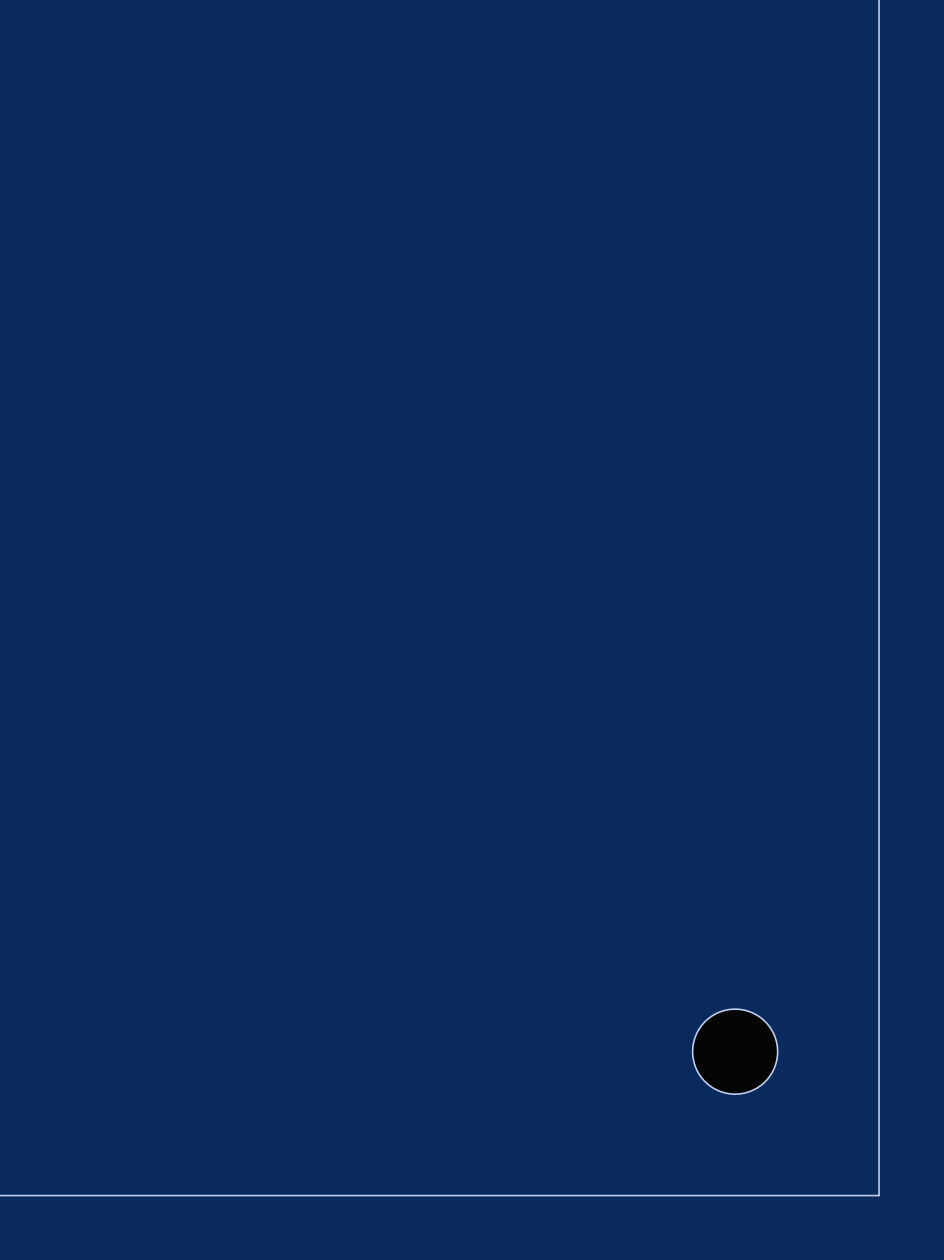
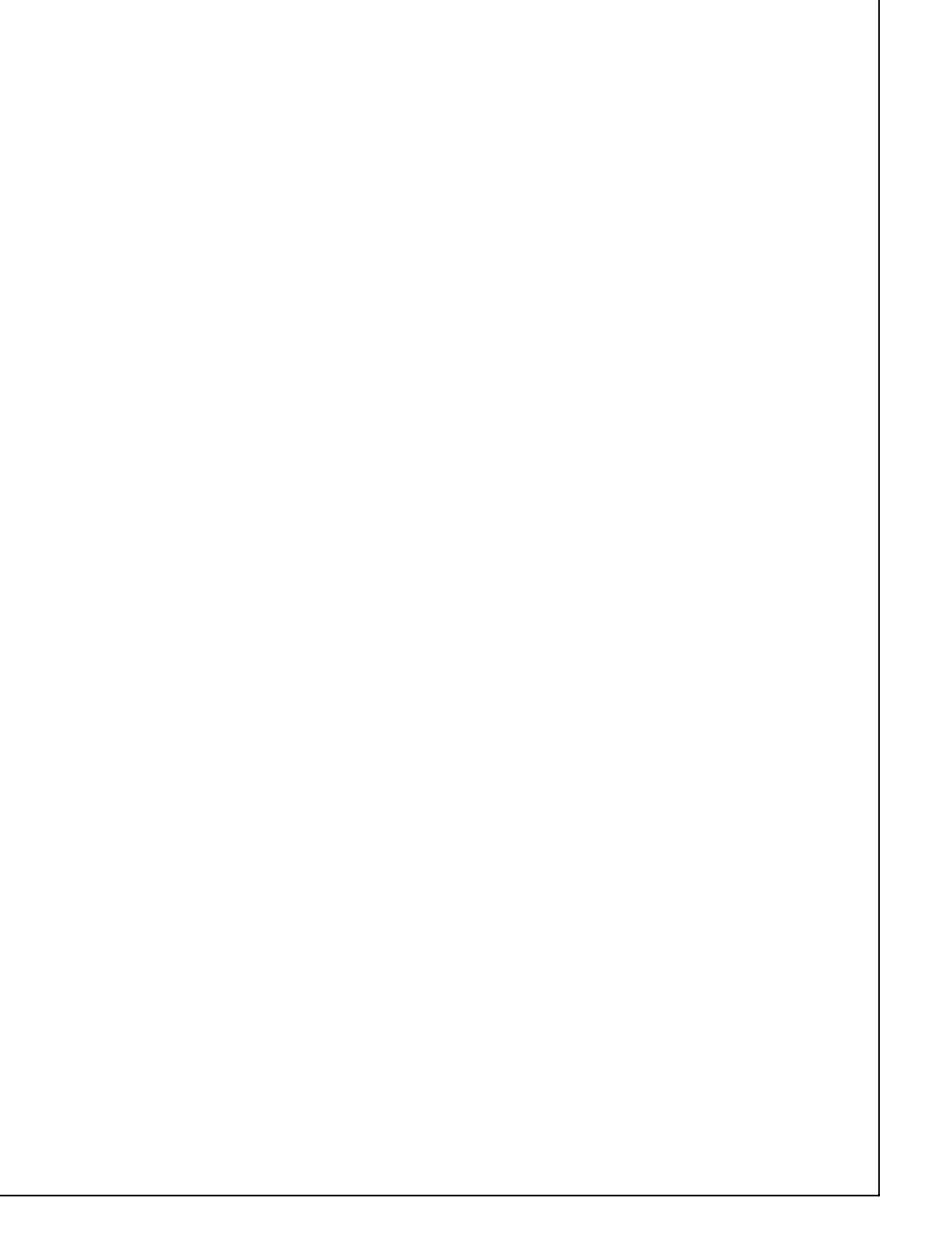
hole: (735, 1051) -> none

